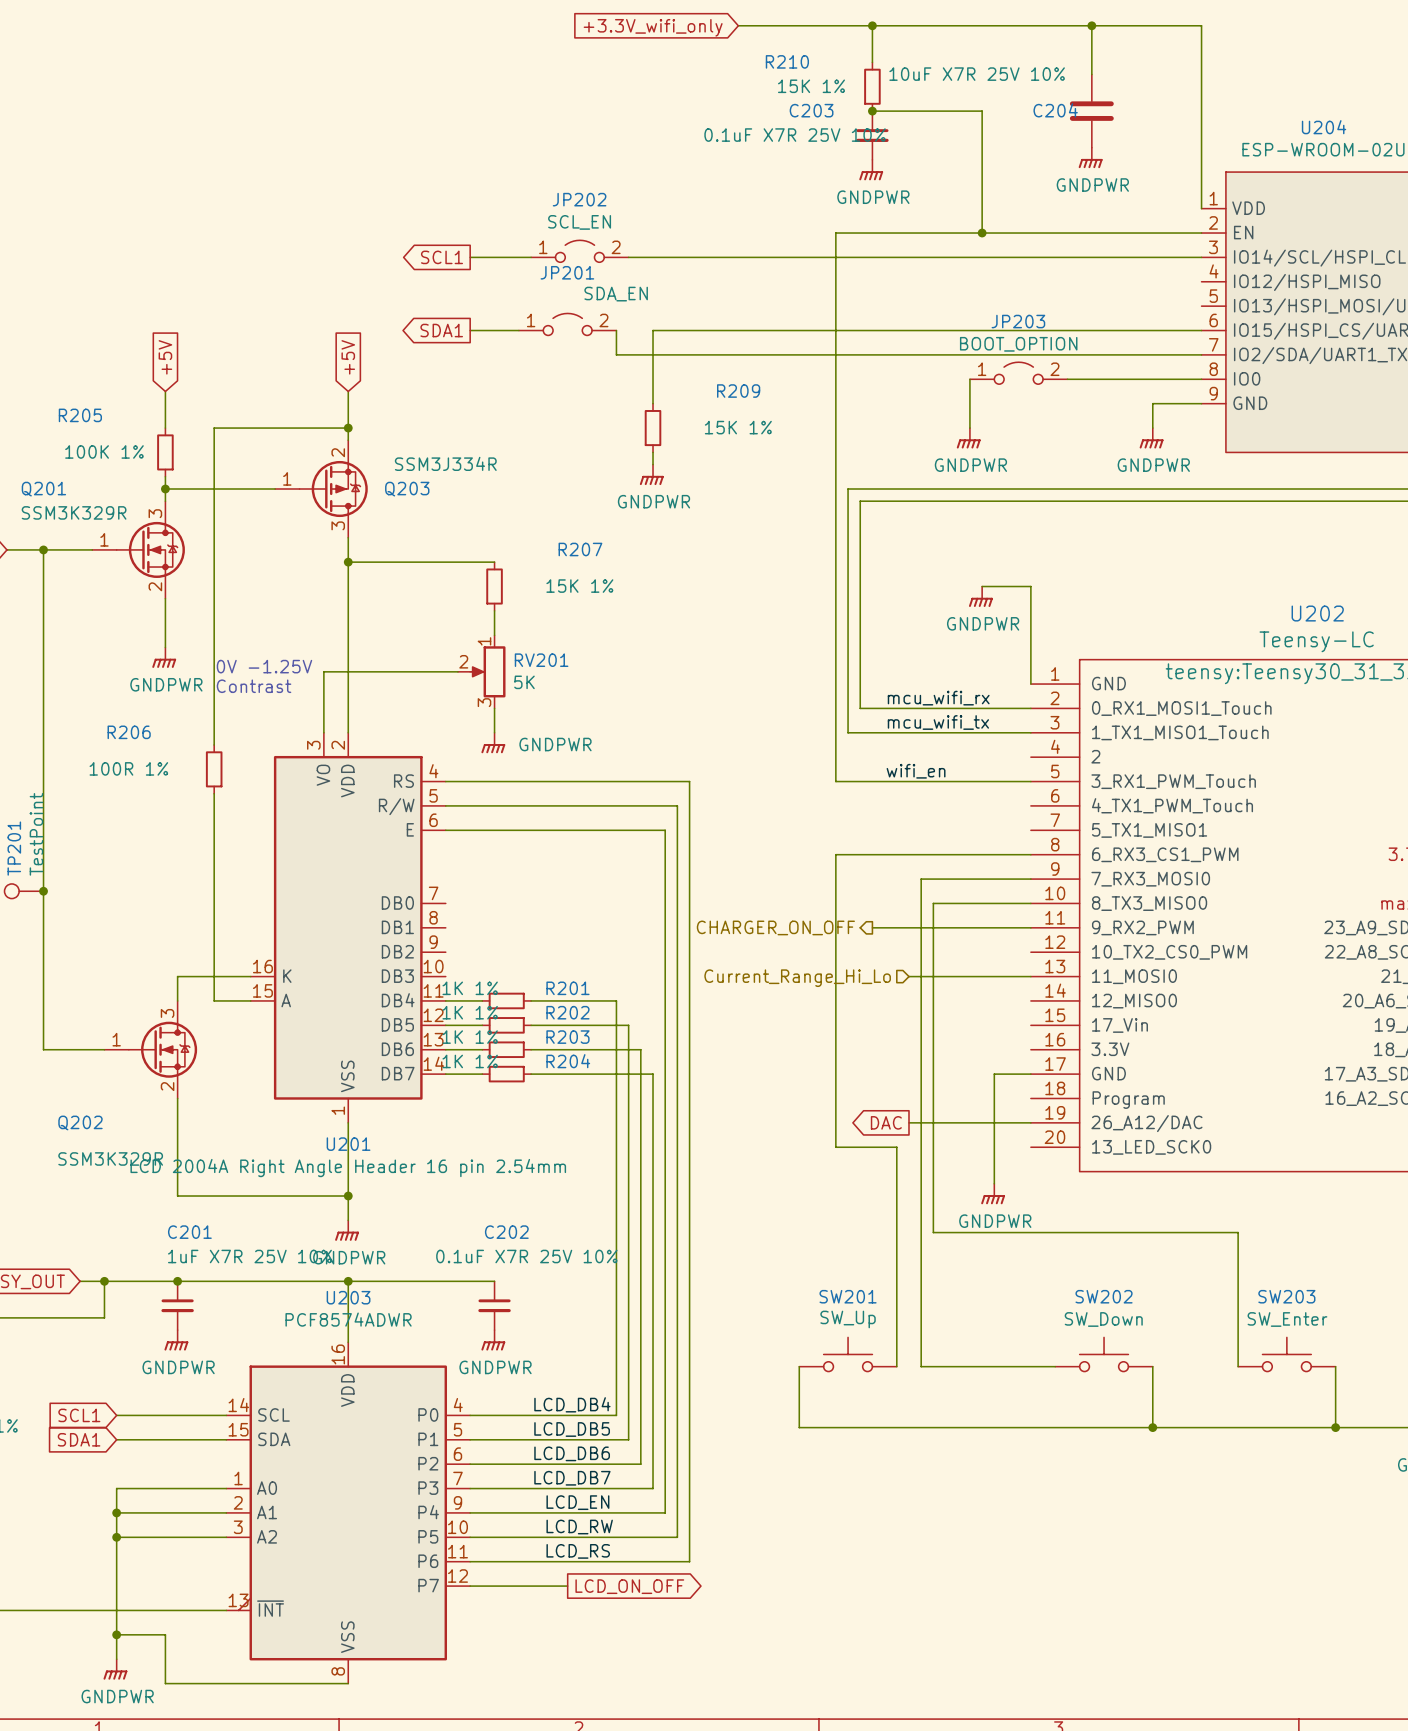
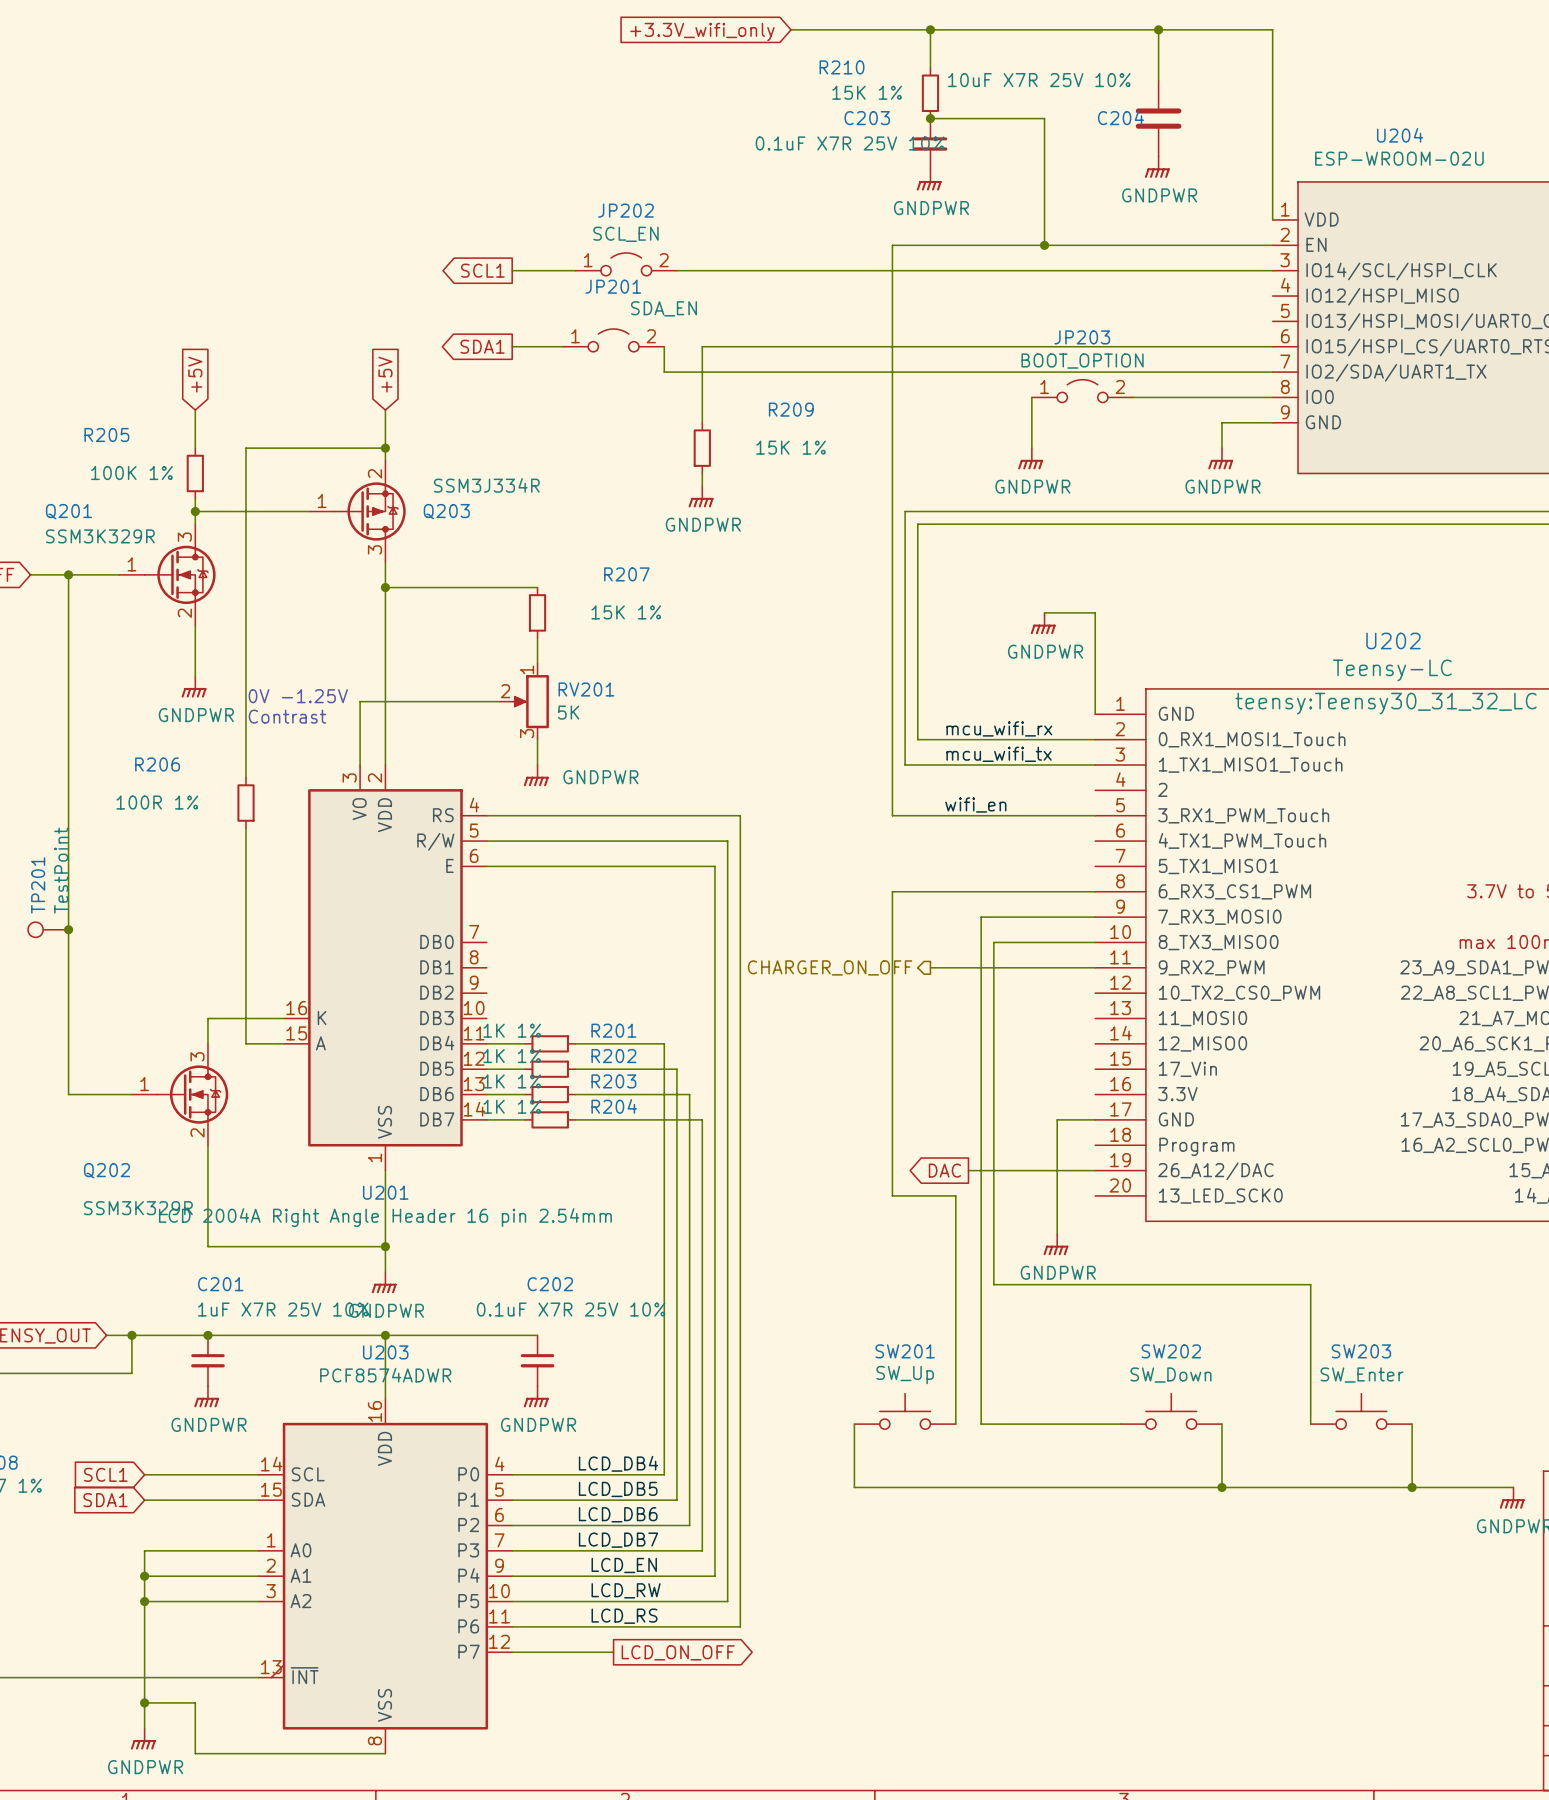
wire: (908, 976) (1030, 976) -> none
hierarchical label: Current_Range_Hi_Lo (797, 978) -> none

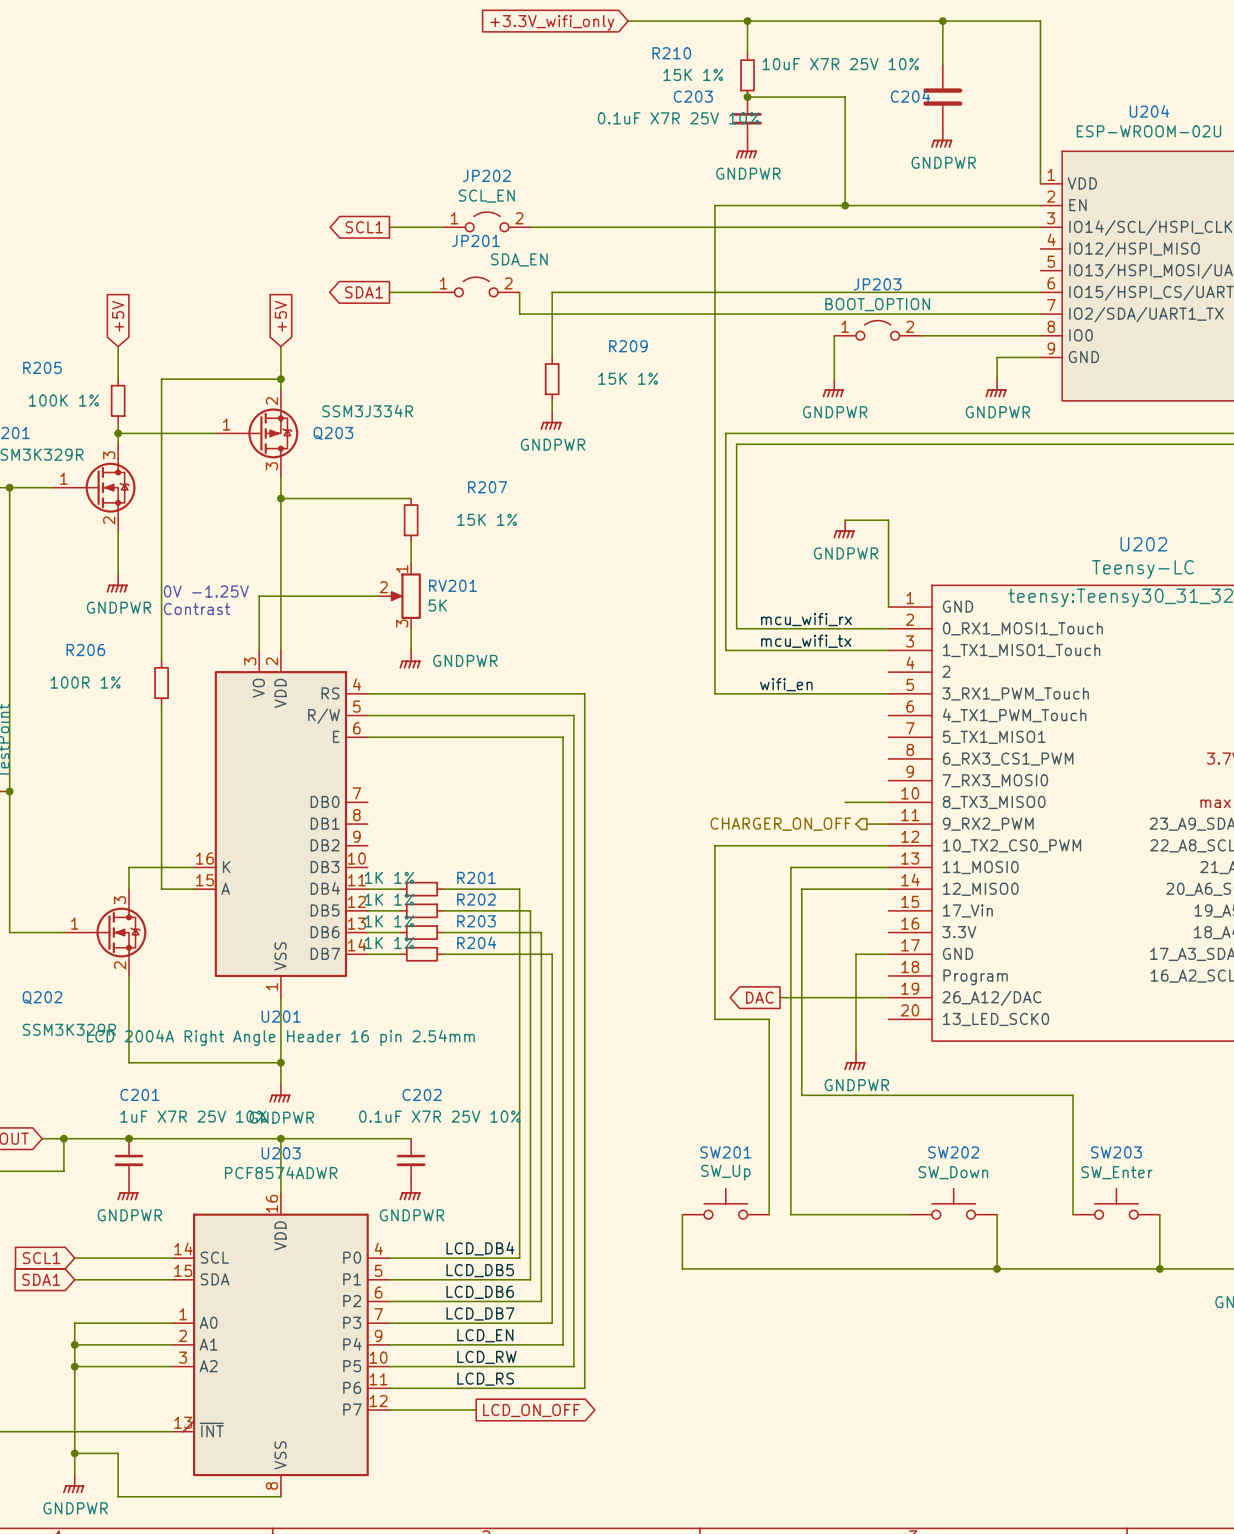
wire: (1095, 891) (892, 891) (892, 993) -> (888, 845) (714, 845)
wire: (1095, 917) (981, 917) (981, 1018) -> (888, 867) (790, 867)
wire: (1044, 942) (993, 942) (993, 1043) -> (888, 889) (801, 889)
hierarchical label position: CHARGER_ON_OFF (830, 967) -> CHARGER_ON_OFF (780, 824)
wire: (930, 967) (1069, 967) -> none

